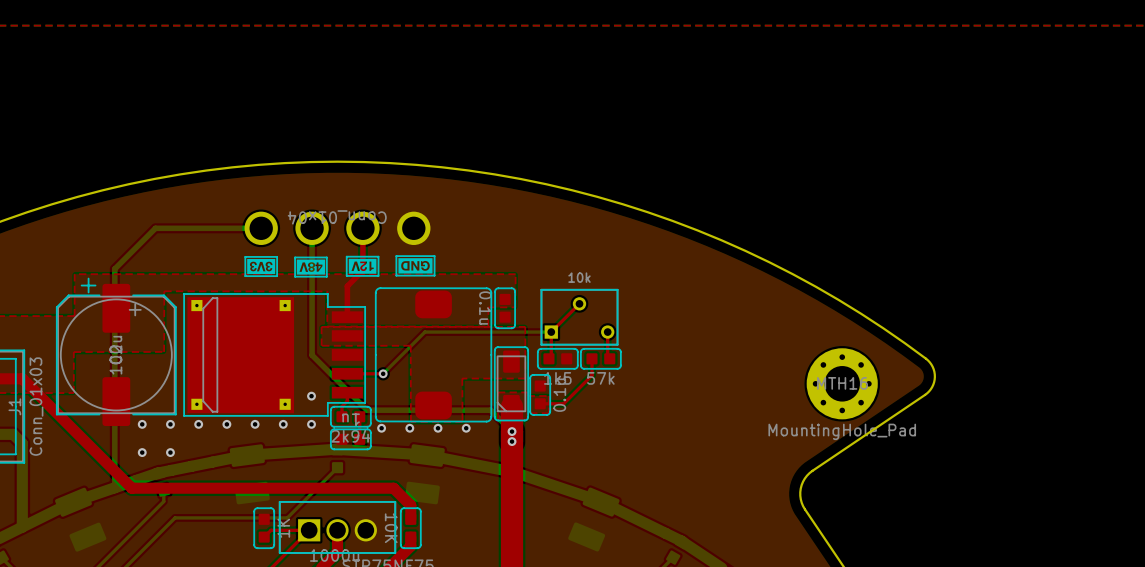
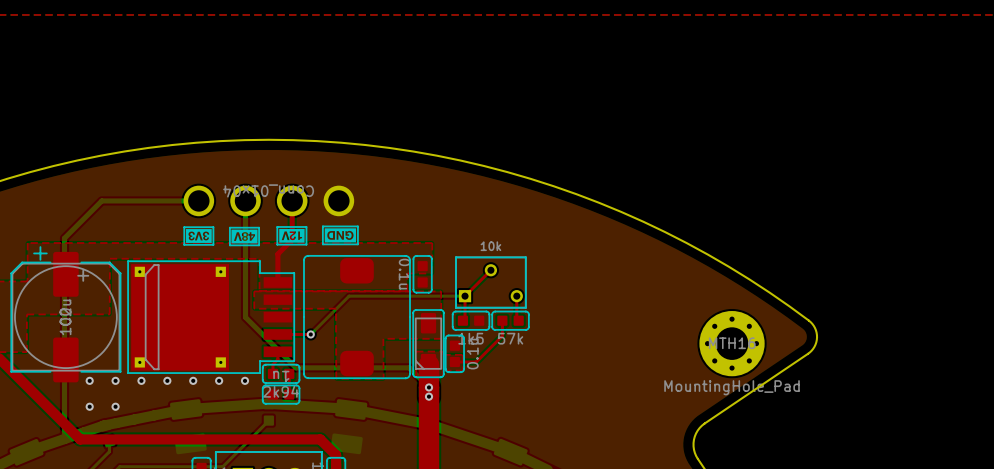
via: (311, 396) -> none
via: (381, 428) -> none
via: (409, 428) -> none
via: (438, 428) -> none
via: (466, 428) -> none

